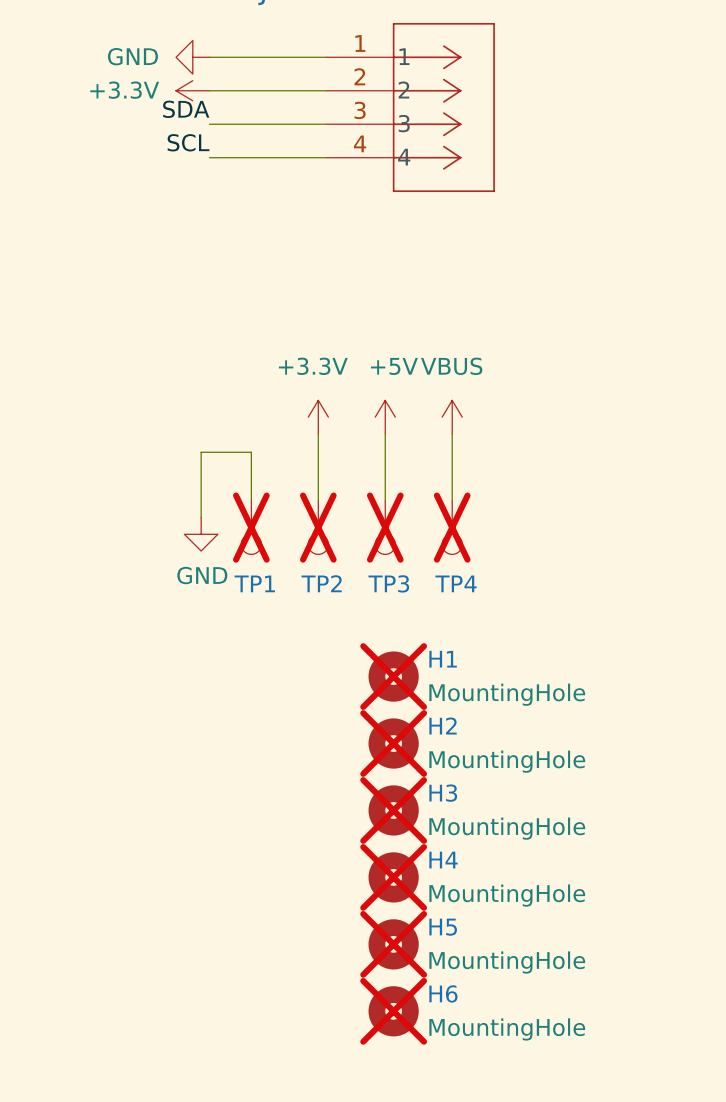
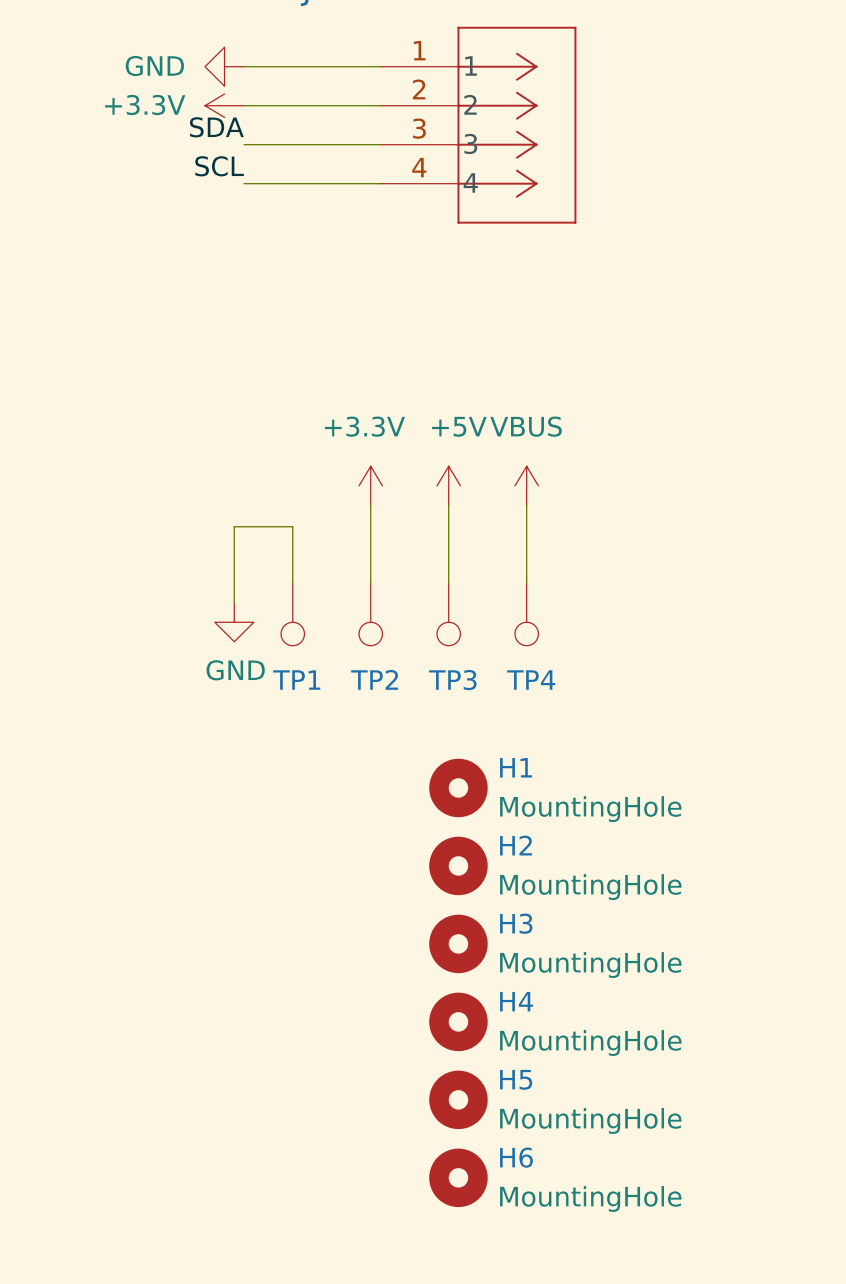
TP1 do-not-place cross: (251, 527) -> none
TP2 do-not-place cross: (318, 527) -> none
TP3 do-not-place cross: (385, 527) -> none
TP4 do-not-place cross: (452, 527) -> none
H1 do-not-place cross: (393, 676) -> none
H2 do-not-place cross: (393, 743) -> none
H3 do-not-place cross: (393, 810) -> none
H4 do-not-place cross: (393, 877) -> none
H5 do-not-place cross: (393, 944) -> none
H6 do-not-place cross: (393, 1011) -> none

